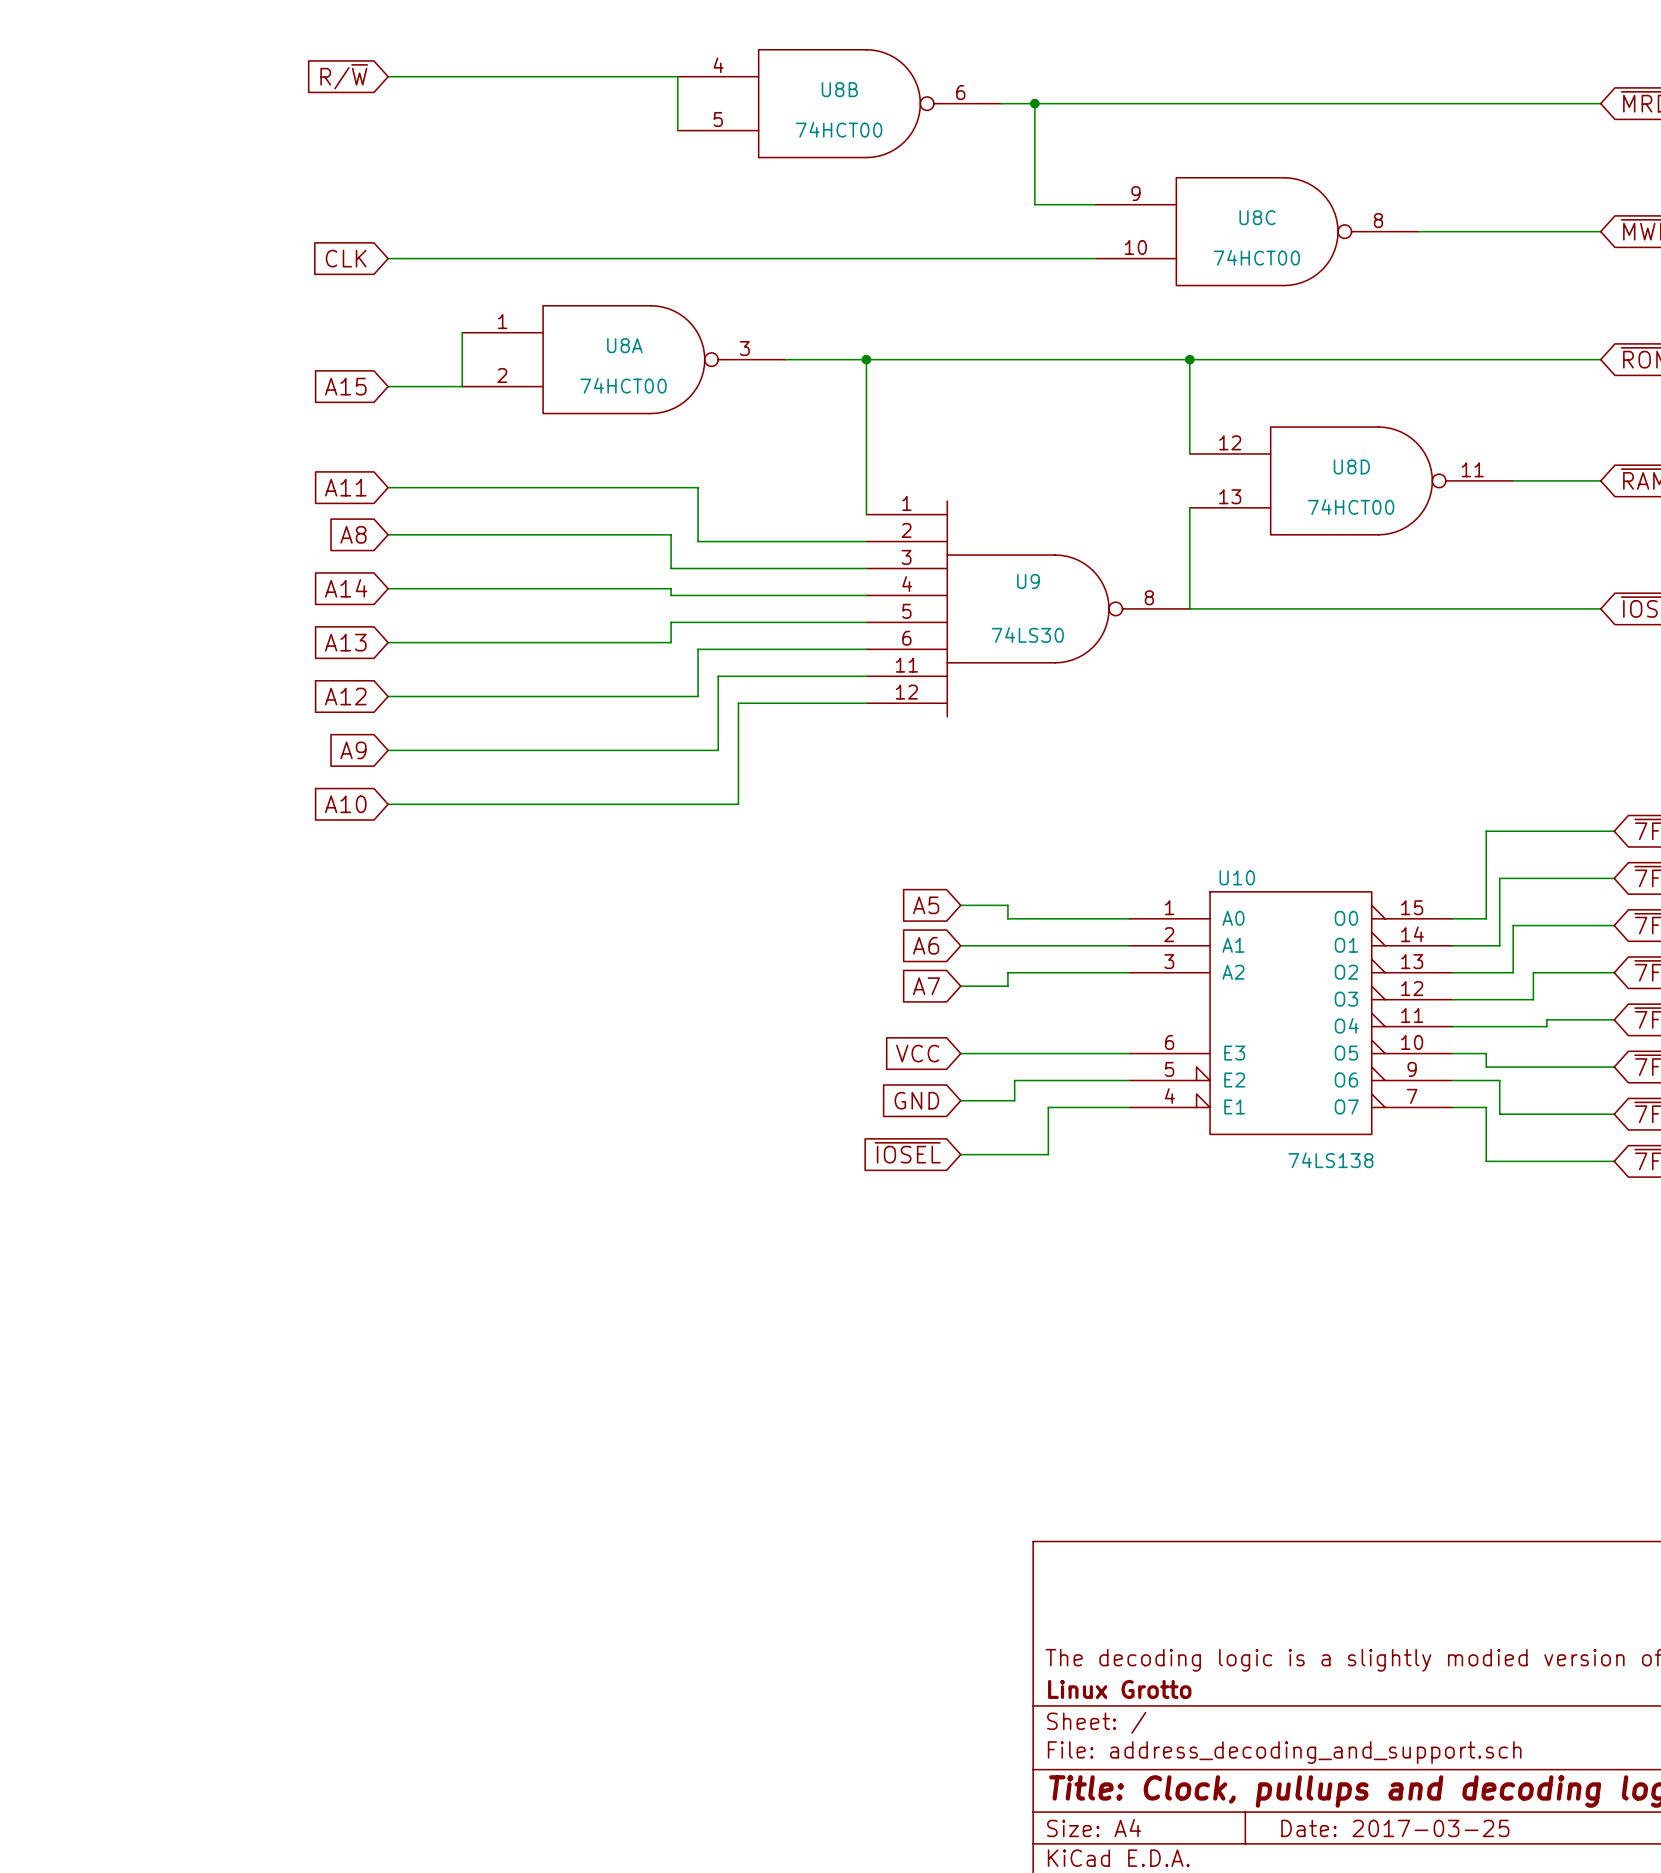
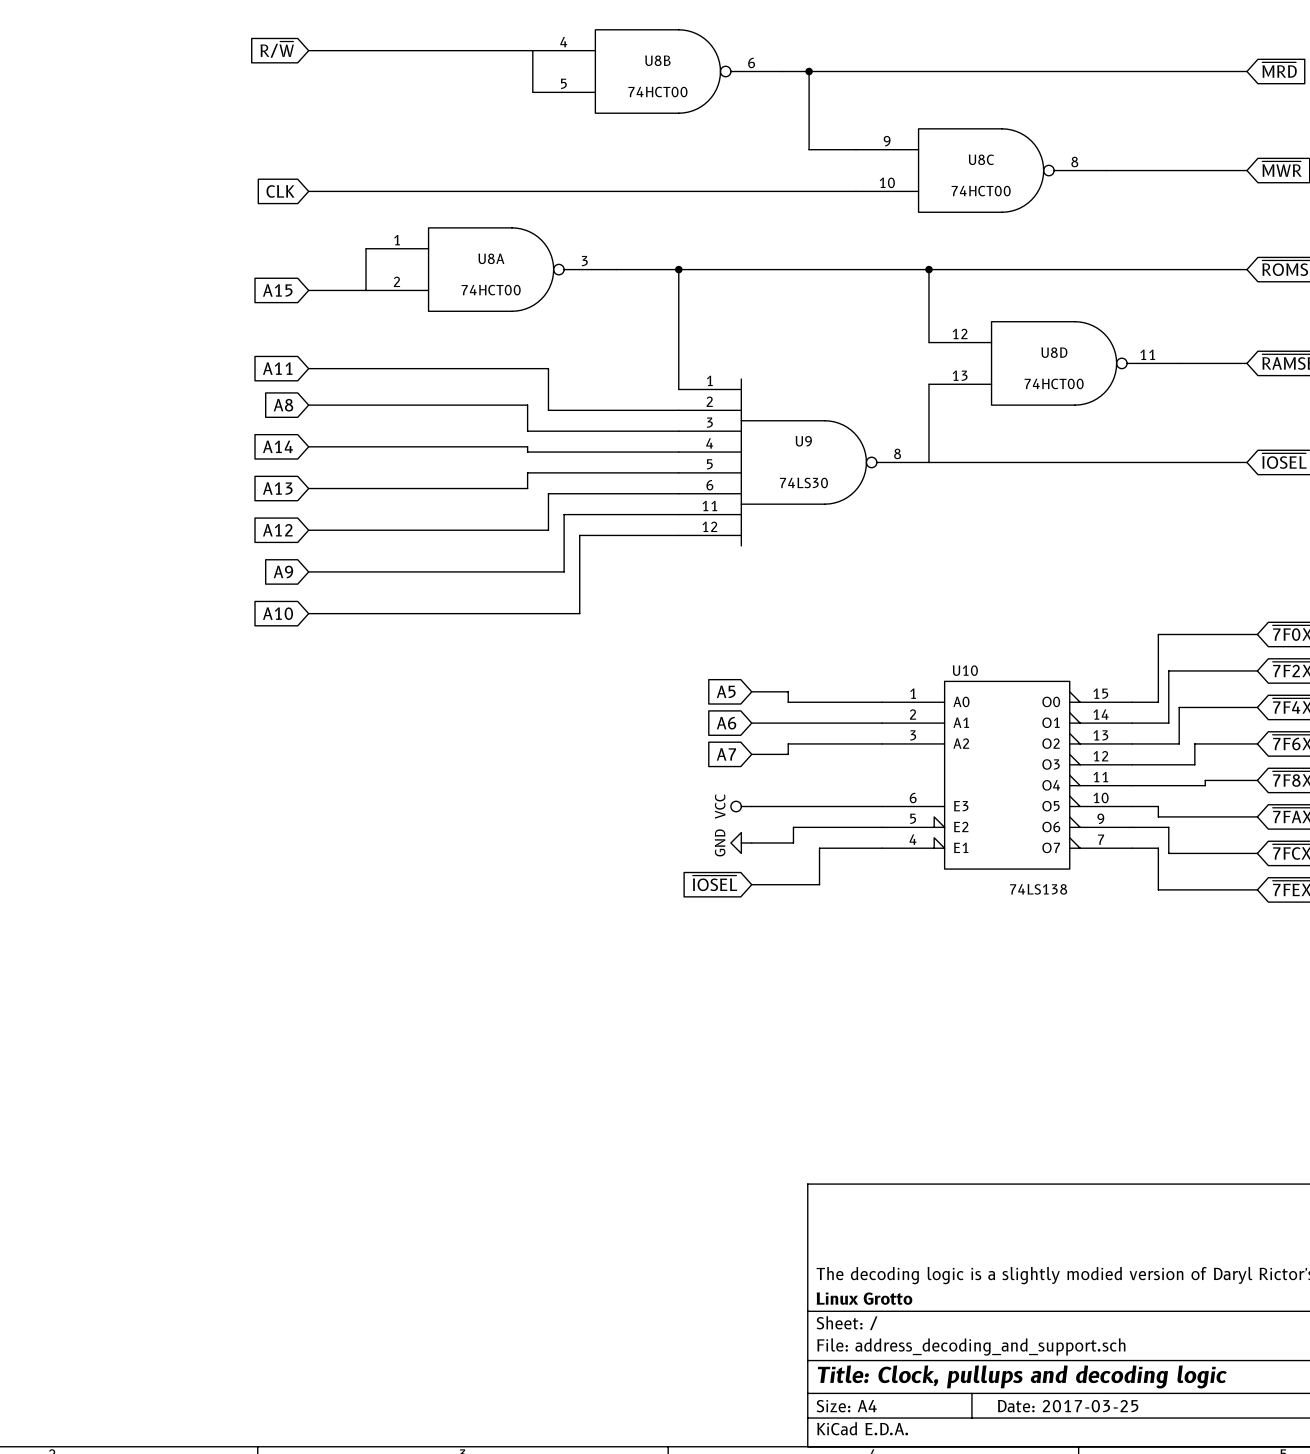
global label: VCC (917, 1053) -> none
power symbol: none -> VCC (741, 806)
global label: GND (916, 1100) -> none
power symbol: none -> GND (741, 843)

